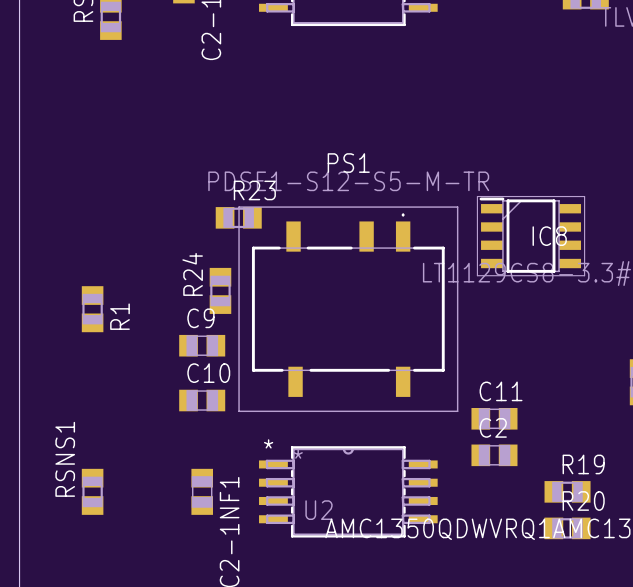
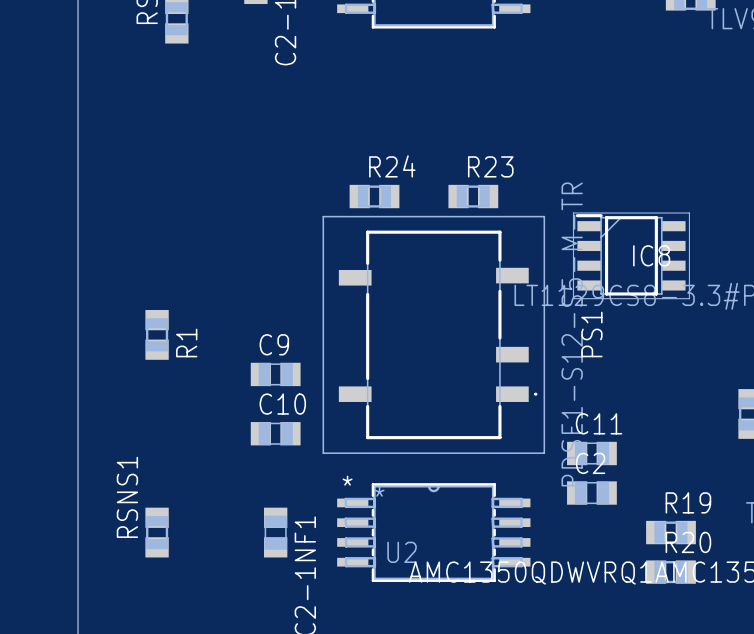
R23 position: (238, 217) -> (473, 196)
R24 rotation: 0° (220, 290) -> 90° clockwise (374, 196)
R24 position: (220, 290) -> (374, 196)
PS1 rotation: 0° (348, 309) -> 90° clockwise (433, 334)

